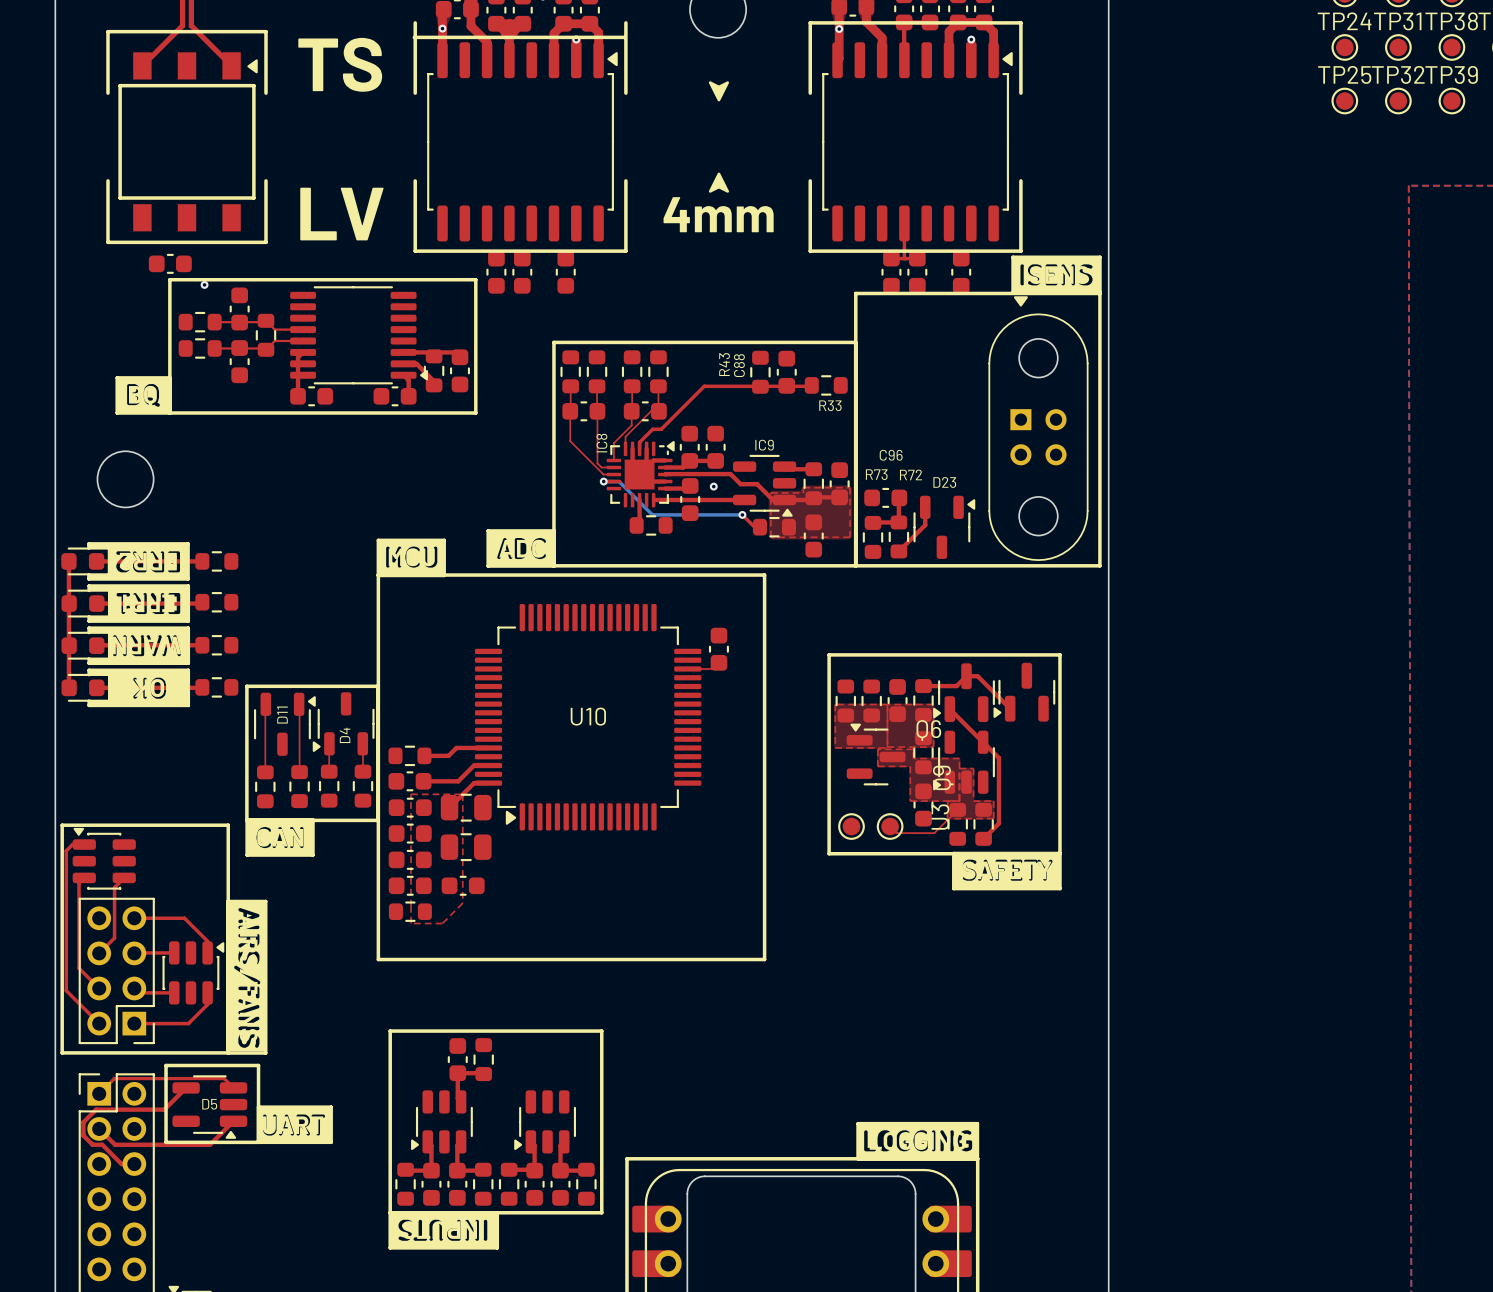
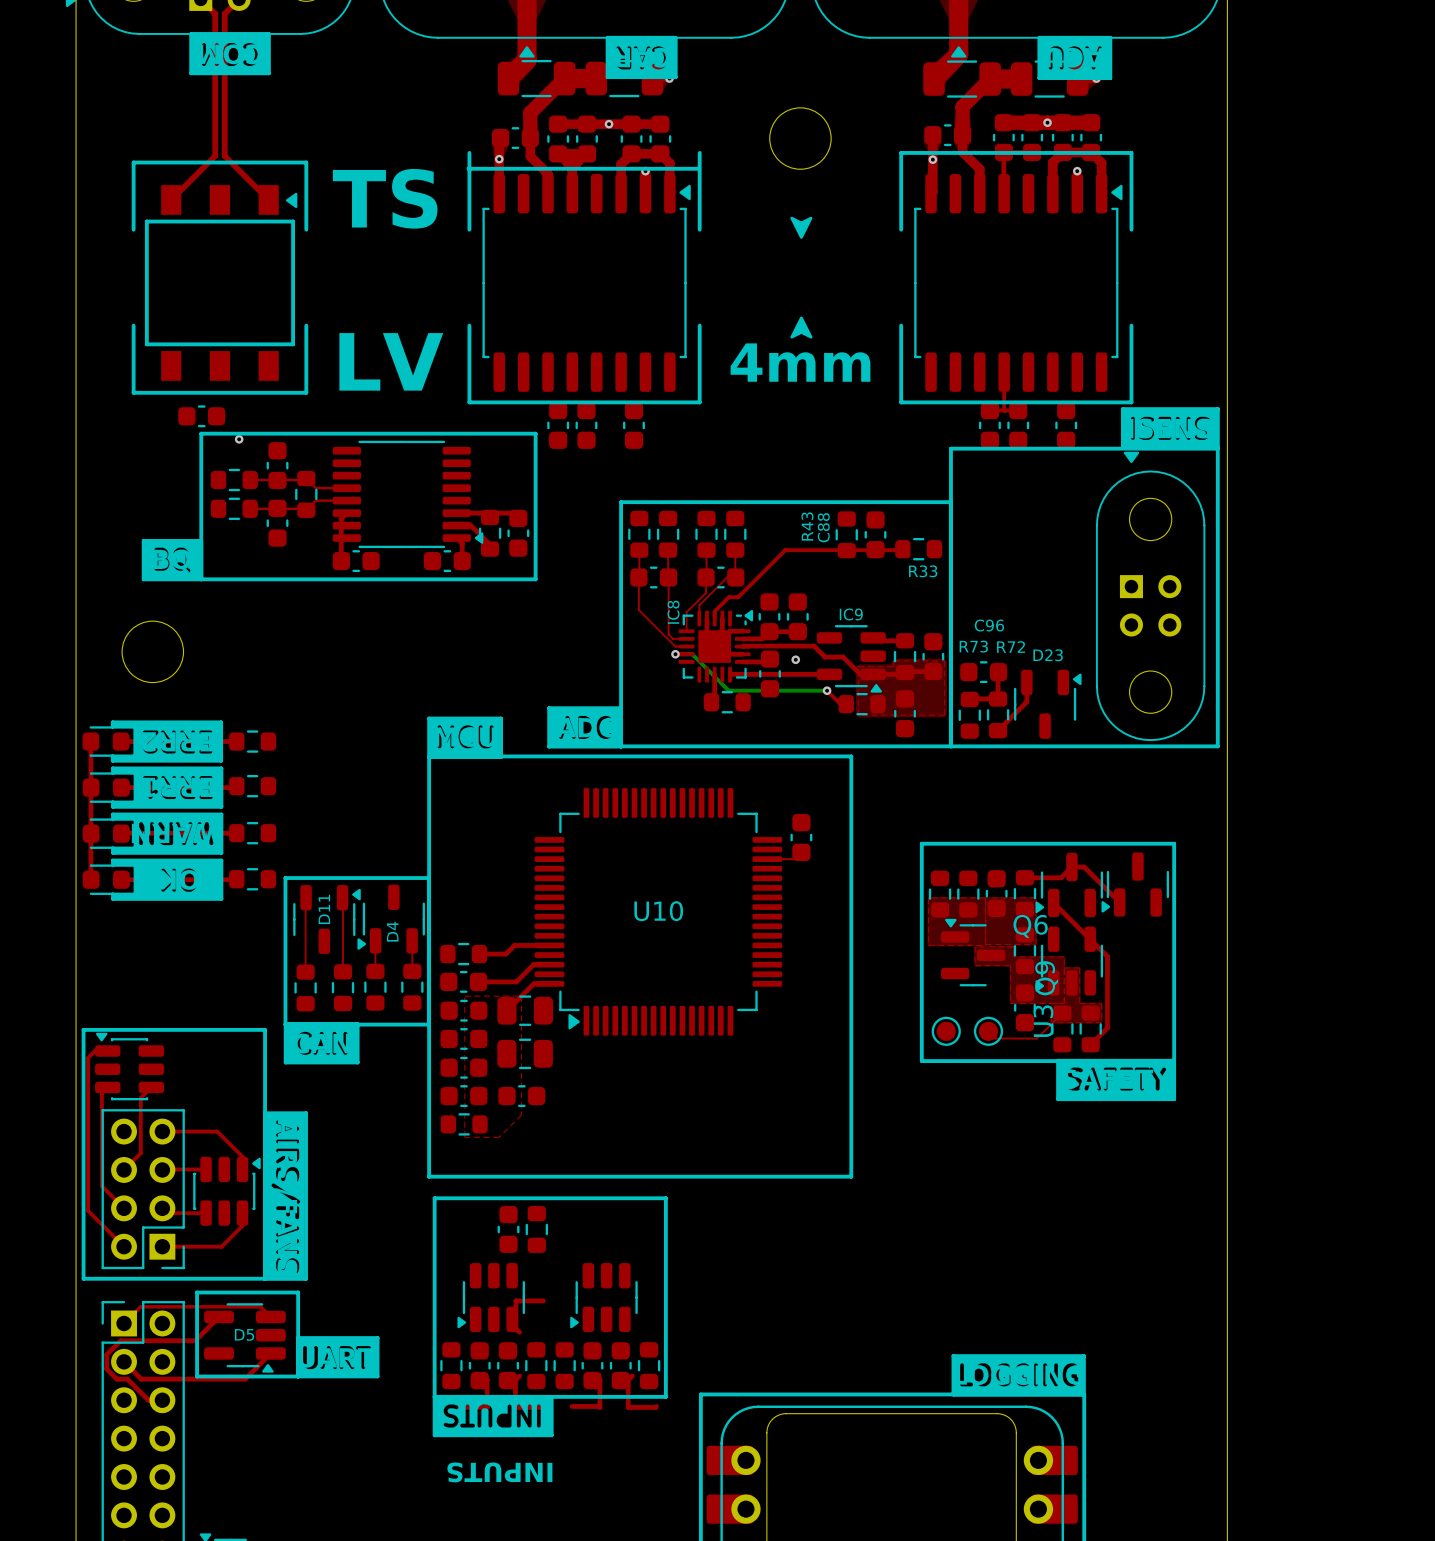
part: none -> (508, 1229)
part: none -> (536, 1229)
part: (457, 1059) -> none
part: (483, 1059) -> none
part position: (441, 1121) -> (491, 1297)
part position: (545, 1121) -> (603, 1297)
part: none -> (451, 1365)
part: none -> (479, 1365)
part: none -> (508, 1365)
part: none -> (536, 1365)
part: none -> (564, 1365)
part: none -> (592, 1365)
part: none -> (620, 1365)
part: none -> (649, 1365)
drawing: none -> [434, 1396, 552, 1436]
part: (405, 1184) -> none
part: (431, 1184) -> none
part: (457, 1184) -> none
part: (483, 1184) -> none
part: (509, 1184) -> none
part: (534, 1184) -> none
part: (560, 1184) -> none
part: (586, 1184) -> none
line: (390, 1212) (601, 1212) (601, 1031) (390, 1031) (390, 1247) (497, 1247) (497, 1212) -> (434, 1396) (665, 1396) (665, 1198) (434, 1198) (434, 1435) (551, 1435) (551, 1396)
drawing: [390, 1212, 498, 1248] -> none

